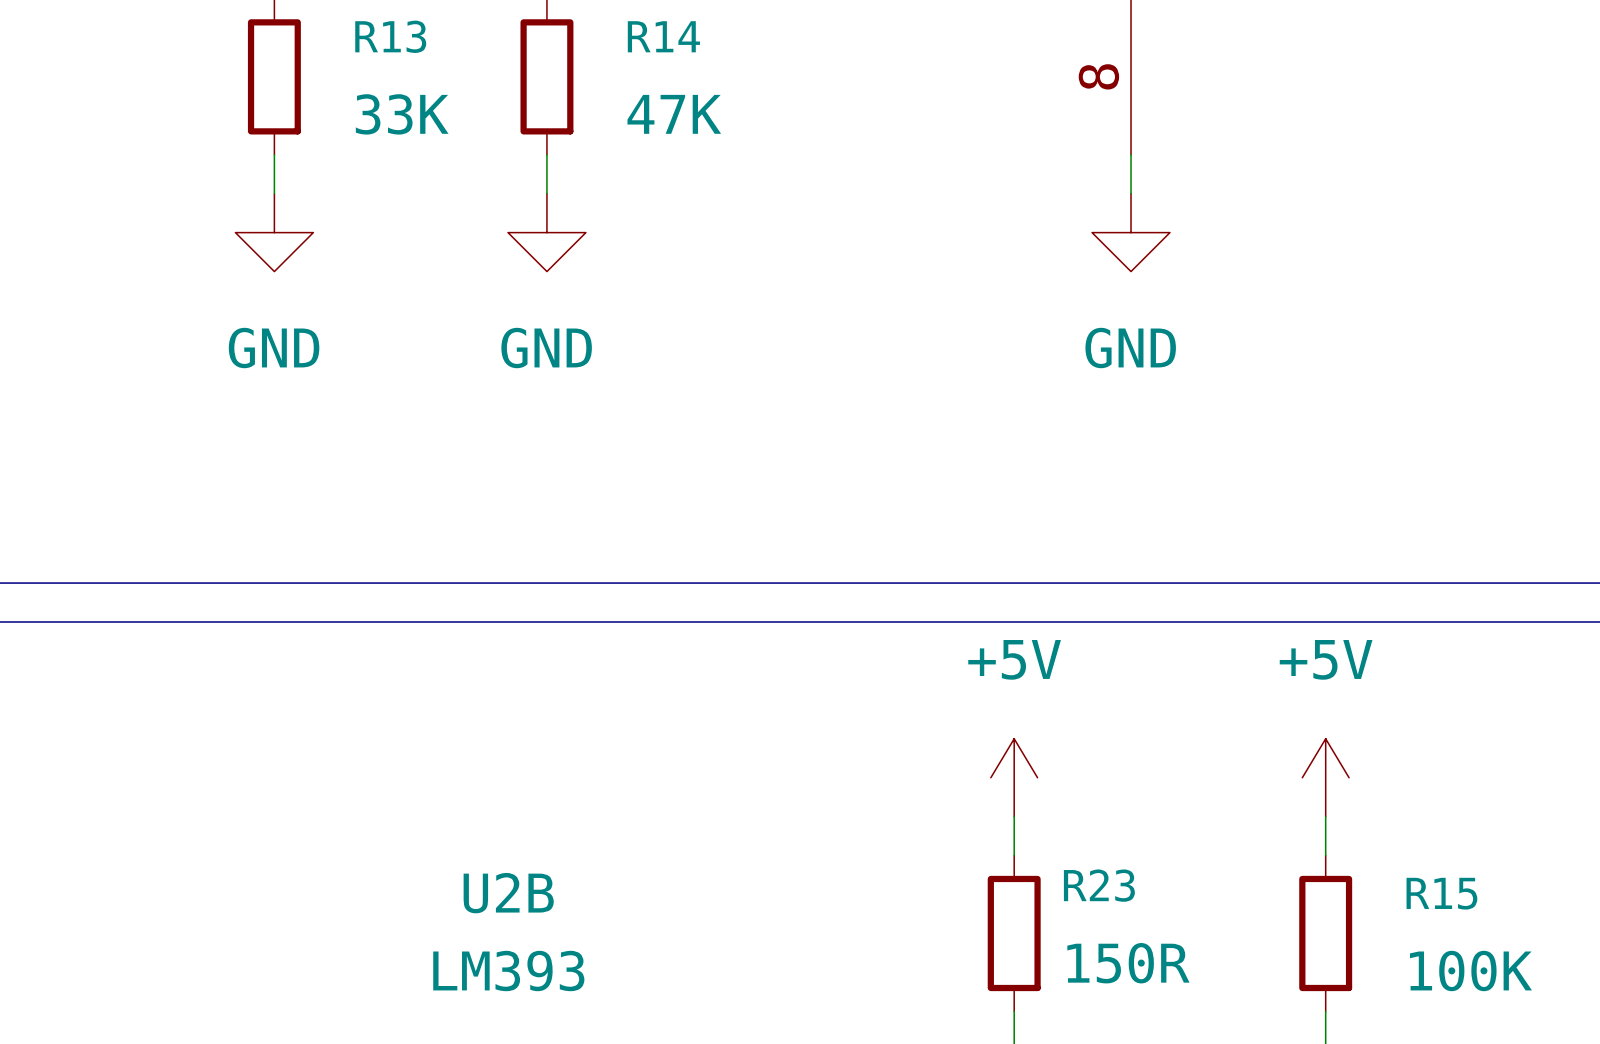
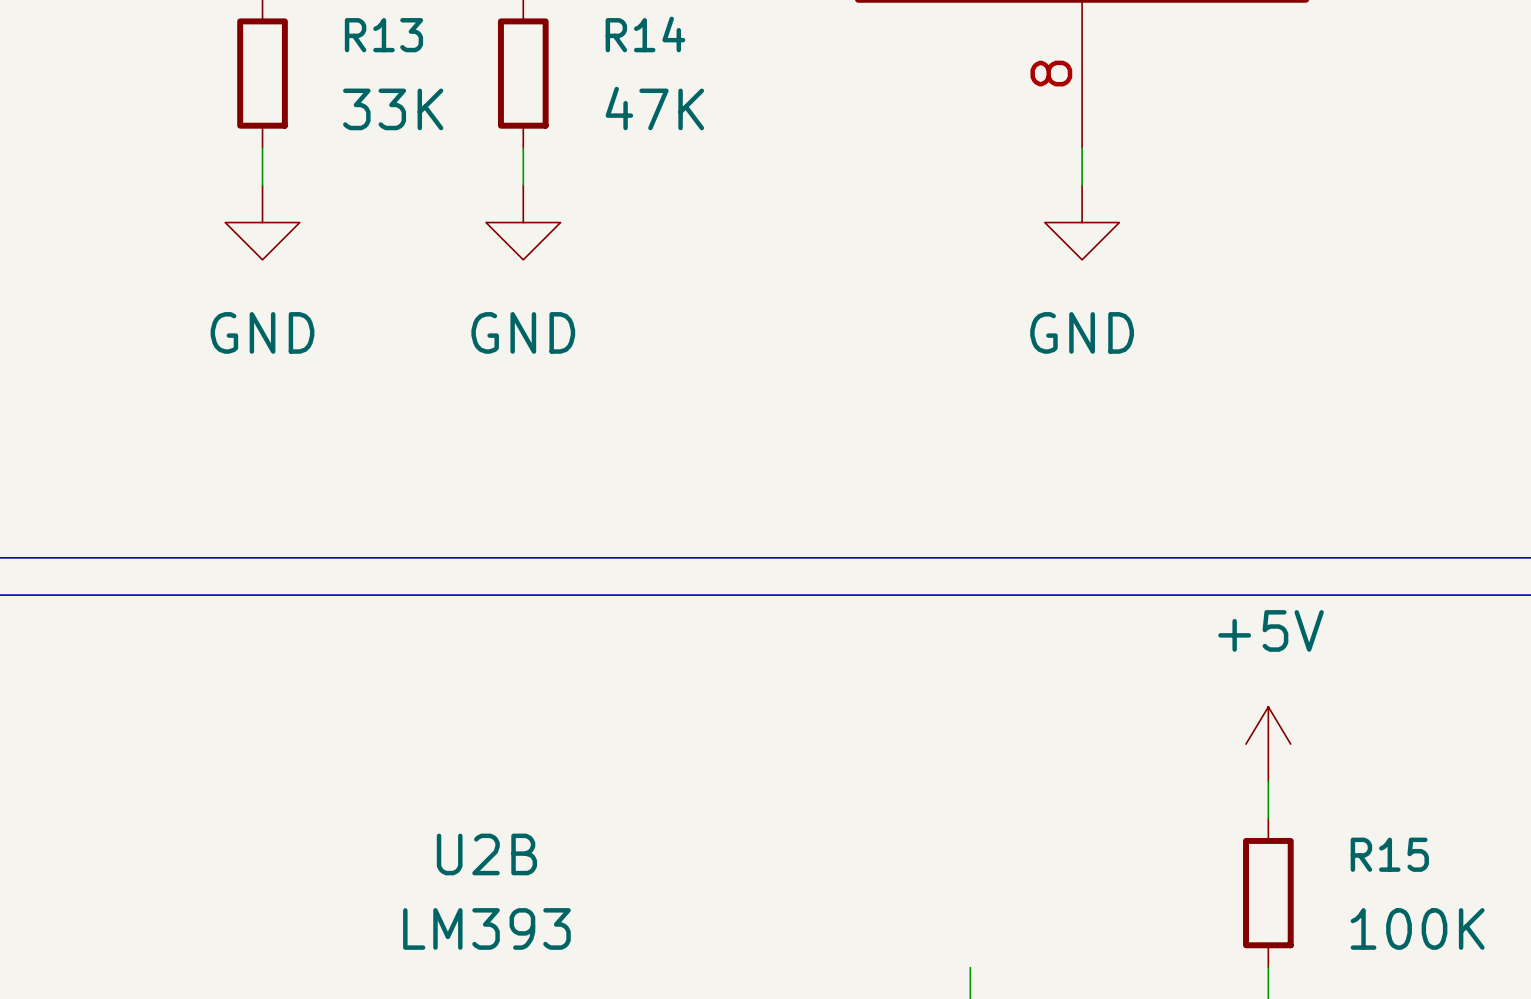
power symbol: +5V (1014, 777) -> none
wire: (1014, 816) (1014, 855) -> none
R23: 150R (1014, 933) -> none

